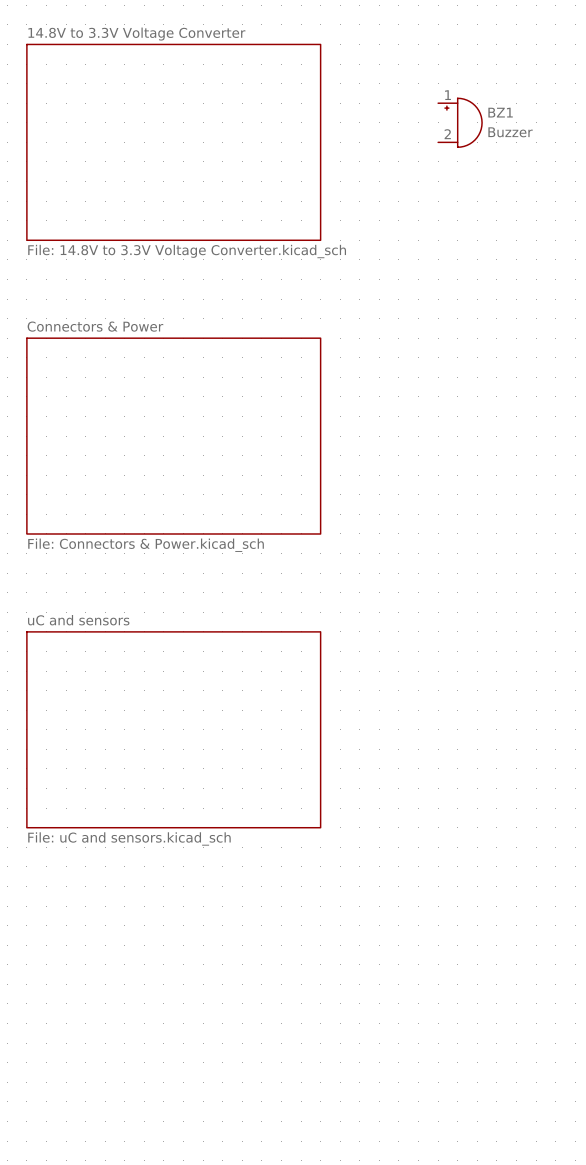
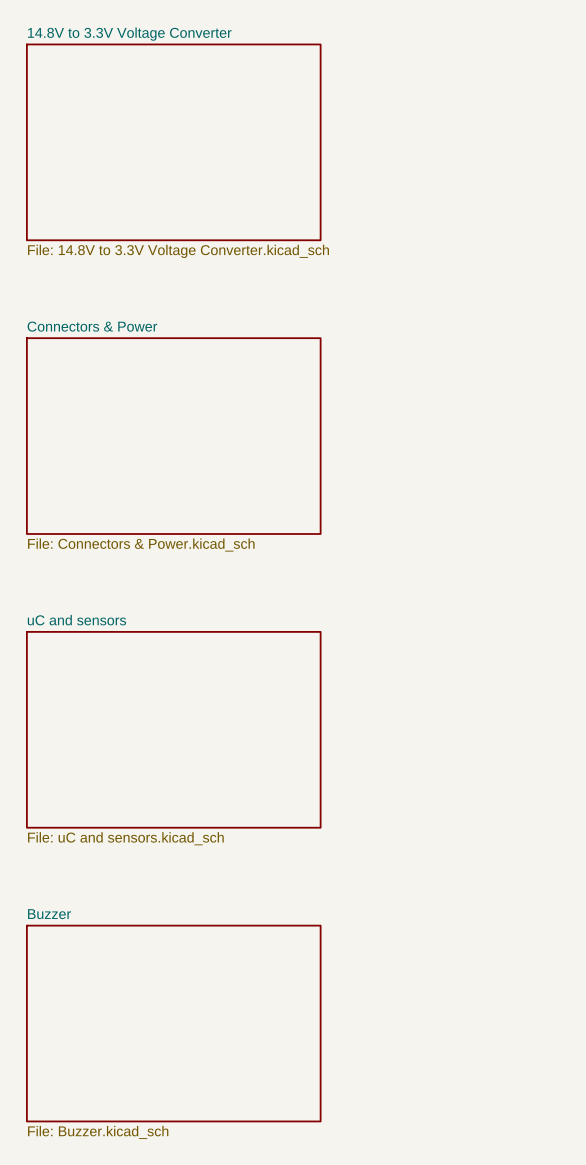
BZ1: Buzzer (460, 122) -> none
sheet Buzzer: none -> File: Buzzer.kicad_sch (173, 1023)

